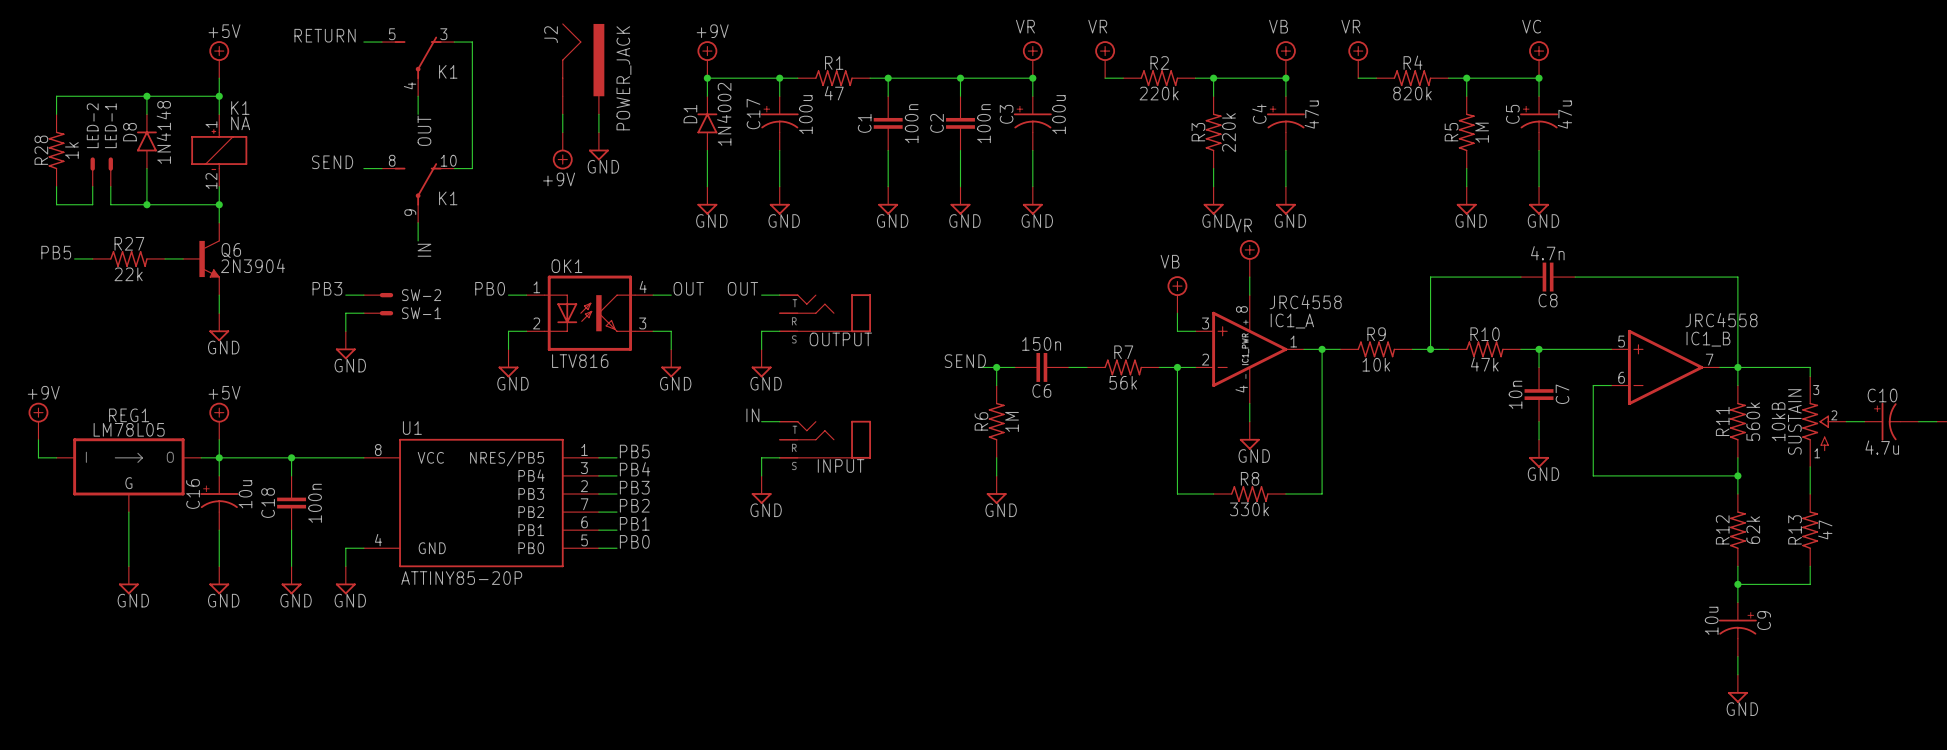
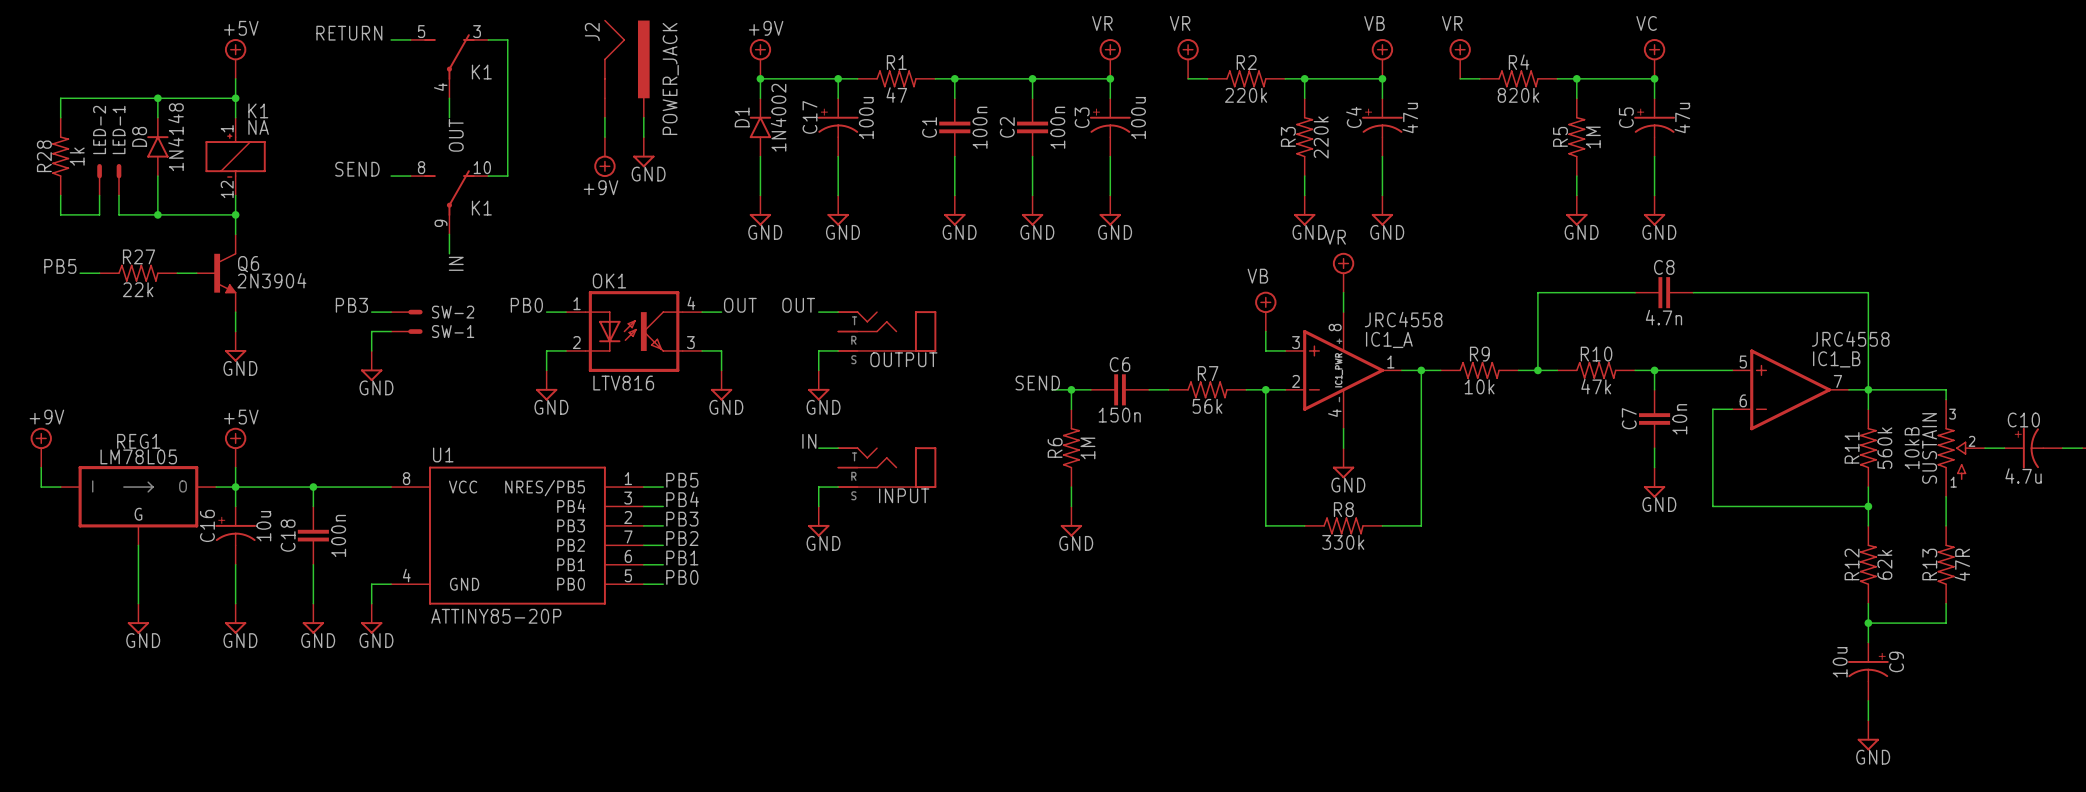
C8 value position: 4.7n (1547, 253) -> 4.7n (1663, 317)
C8 name position: C8 (1548, 300) -> C8 (1664, 267)
C6 value position: 150n (1041, 343) -> 150n (1119, 415)
C6 name position: C6 (1041, 390) -> C6 (1120, 364)
C7 value position: 10n (1515, 394) -> 10n (1679, 419)
C7 name position: C7 (1562, 394) -> C7 (1629, 418)
R13 value: 47 (1825, 529) -> 47R (1962, 564)

